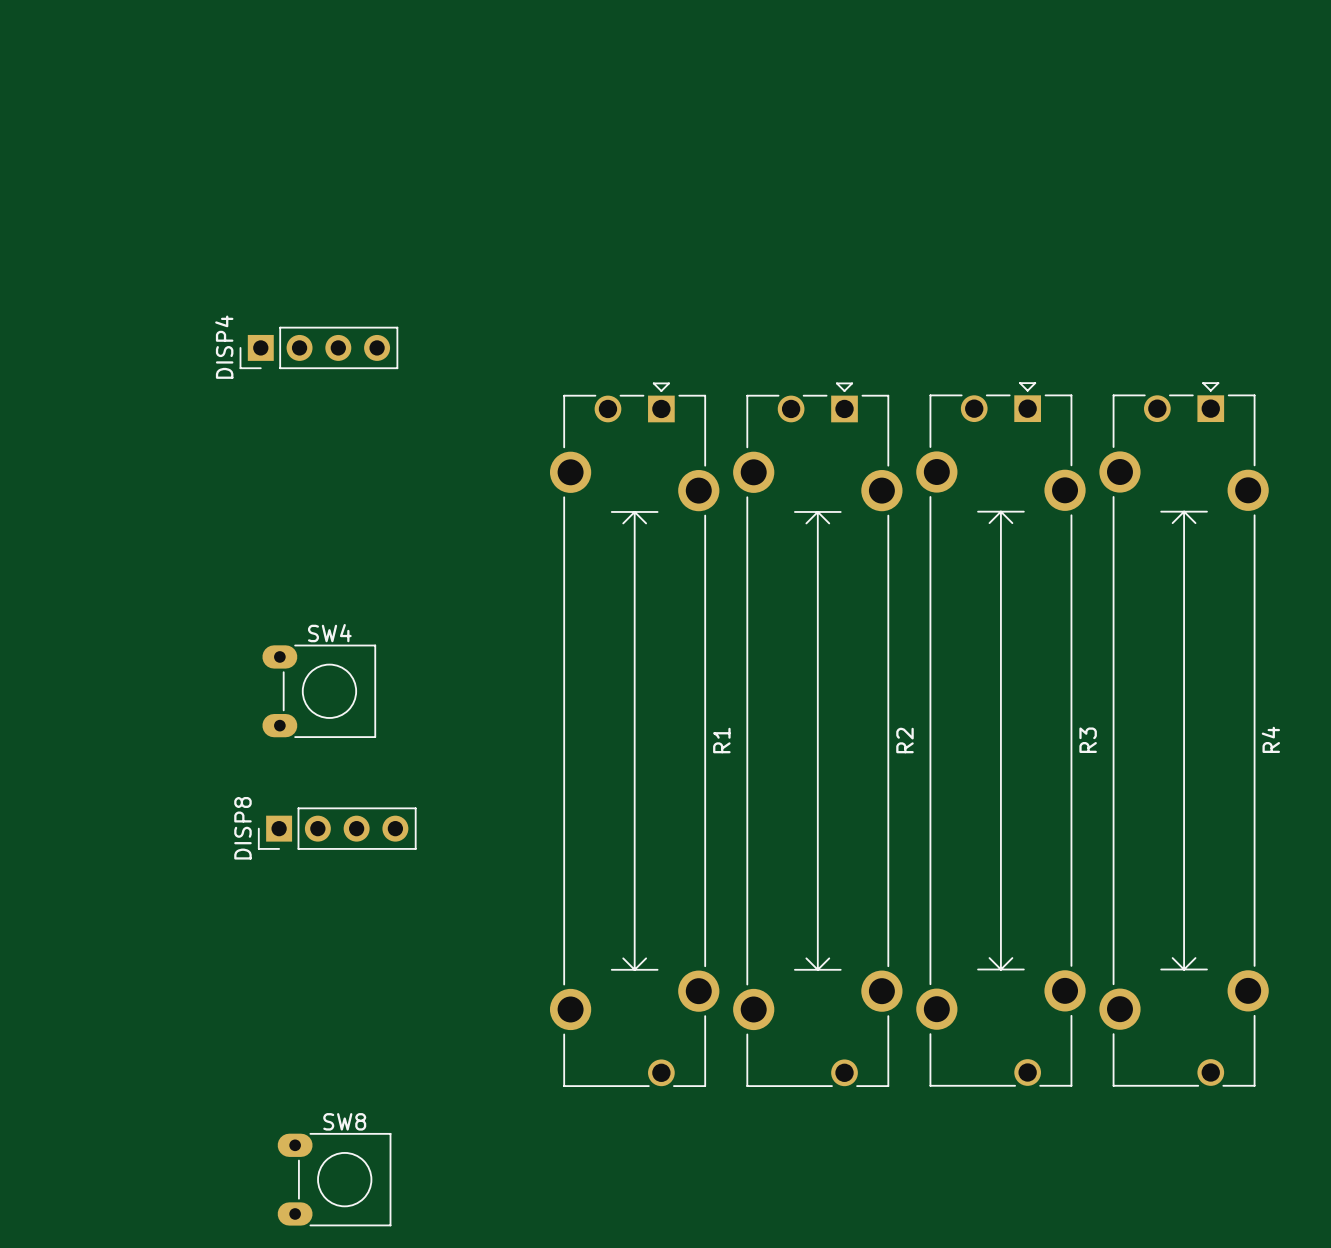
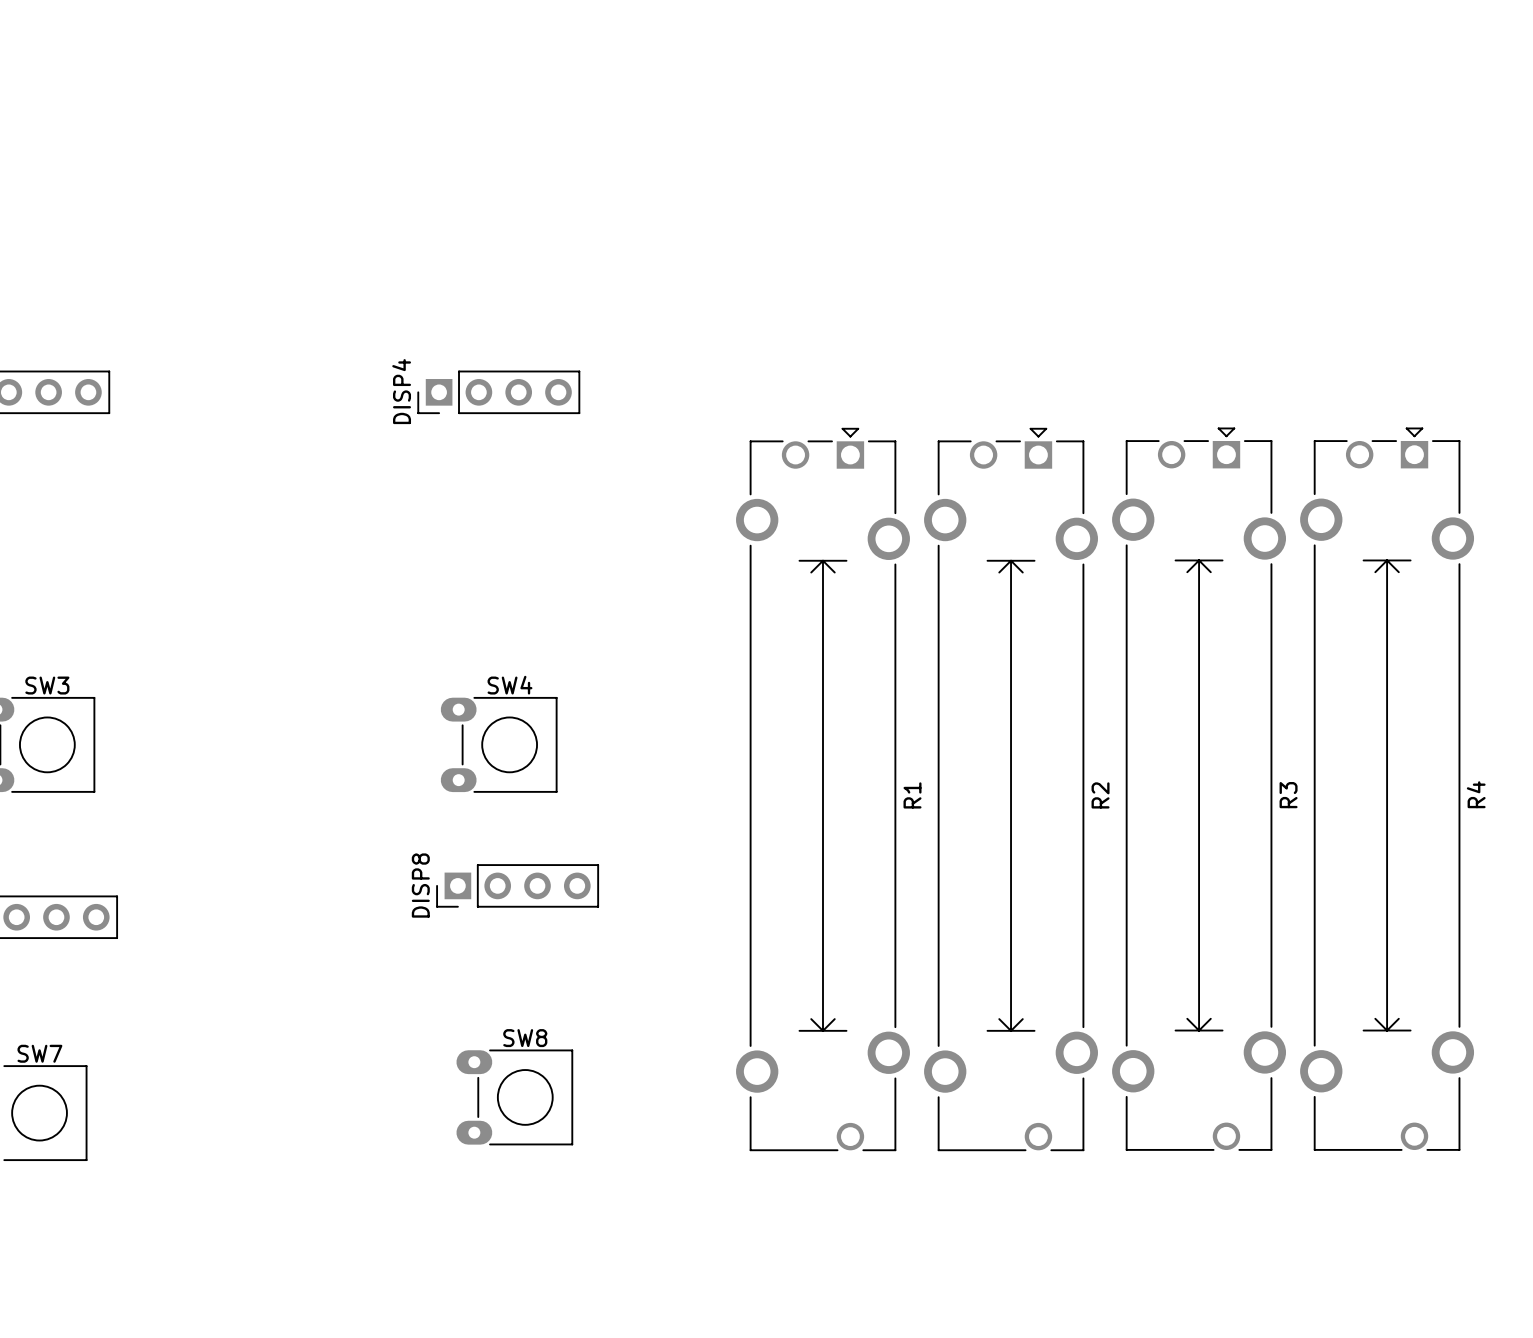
SW8 position: (334, 1179) -> (514, 1097)

